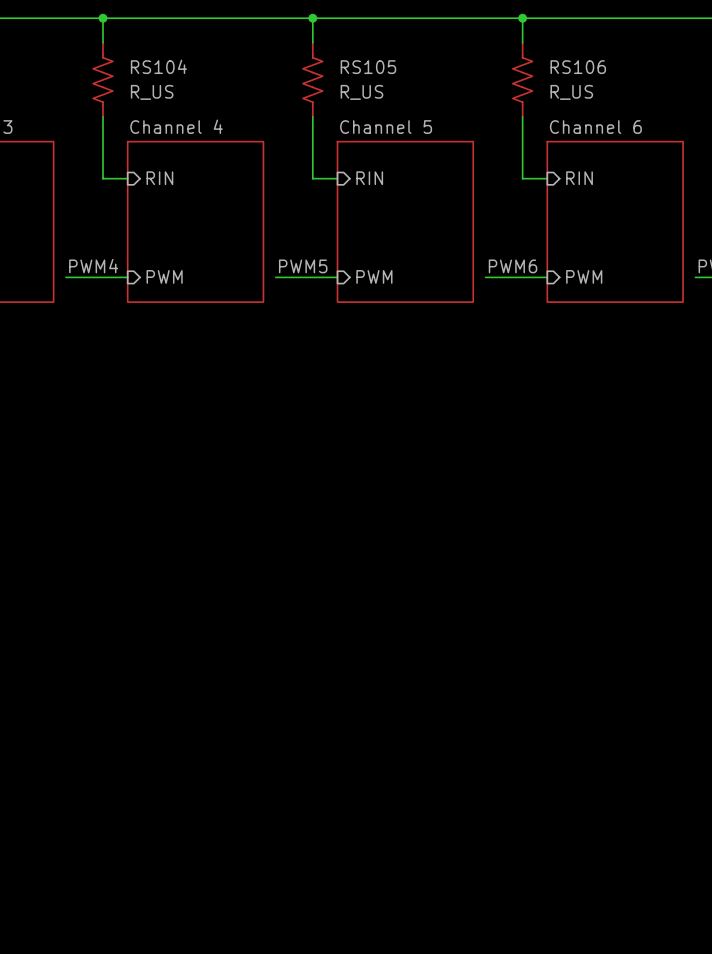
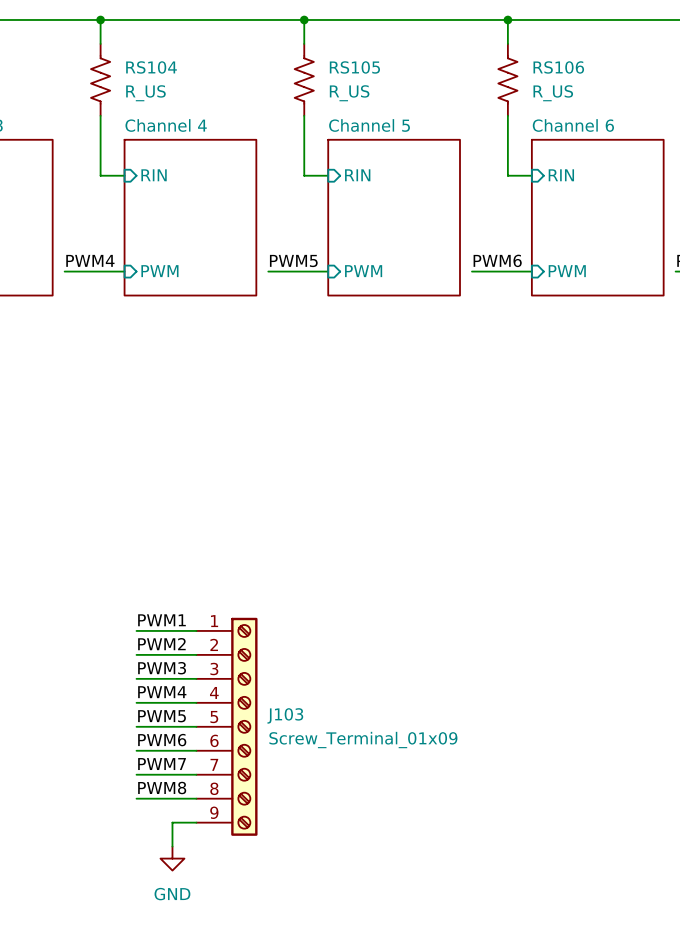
label: none -> PWM1 (161, 620)
wire: none -> (136, 630) (196, 630)
label: none -> PWM2 (161, 644)
wire: none -> (136, 654) (196, 654)
label: none -> PWM3 (162, 668)
wire: none -> (136, 678) (196, 678)
label: none -> PWM4 (162, 692)
wire: none -> (136, 702) (196, 702)
label: none -> PWM5 (162, 716)
wire: none -> (136, 726) (196, 726)
J103: none -> Screw_Terminal_01x09 (226, 726)
label: none -> PWM6 (162, 740)
wire: none -> (136, 750) (196, 750)
label: none -> PWM7 (162, 764)
wire: none -> (136, 774) (196, 774)
label: none -> PWM8 (162, 788)
wire: none -> (136, 798) (196, 798)
wire: none -> (196, 822) (172, 822) (172, 846)
power symbol: none -> GND (172, 858)

